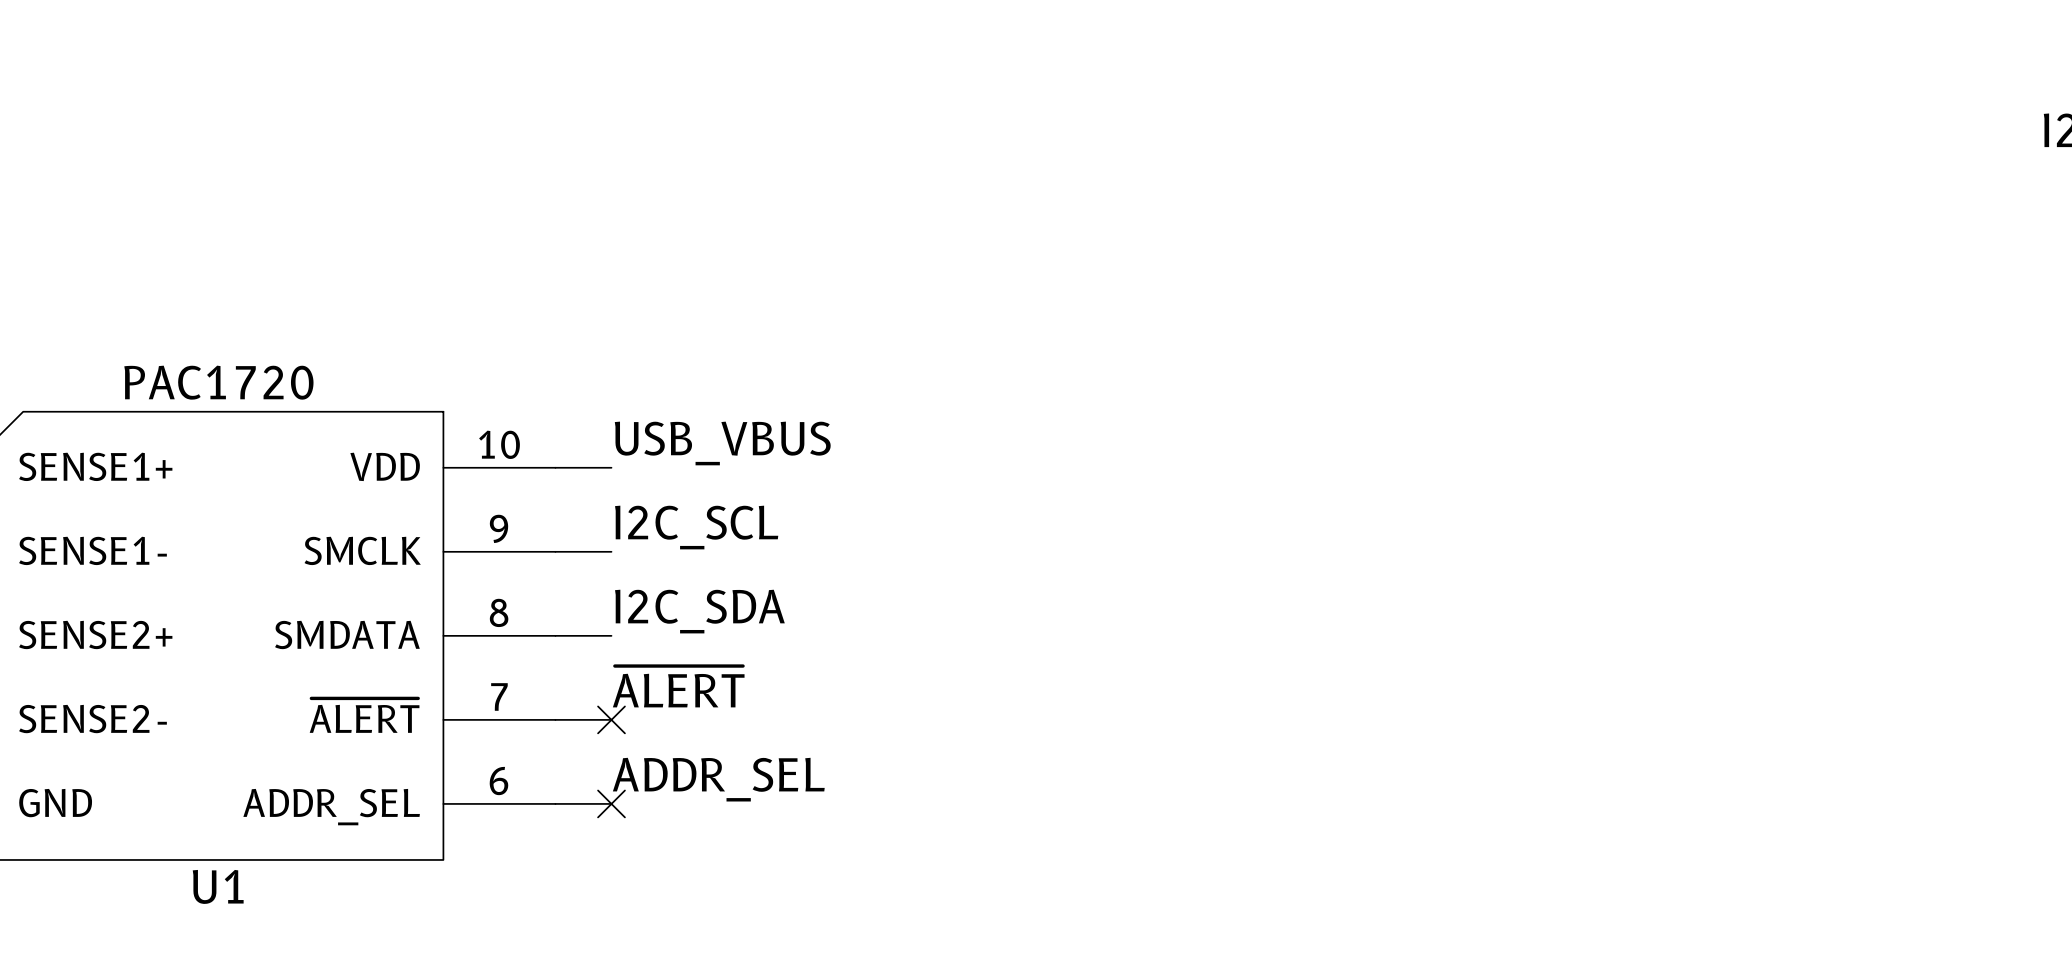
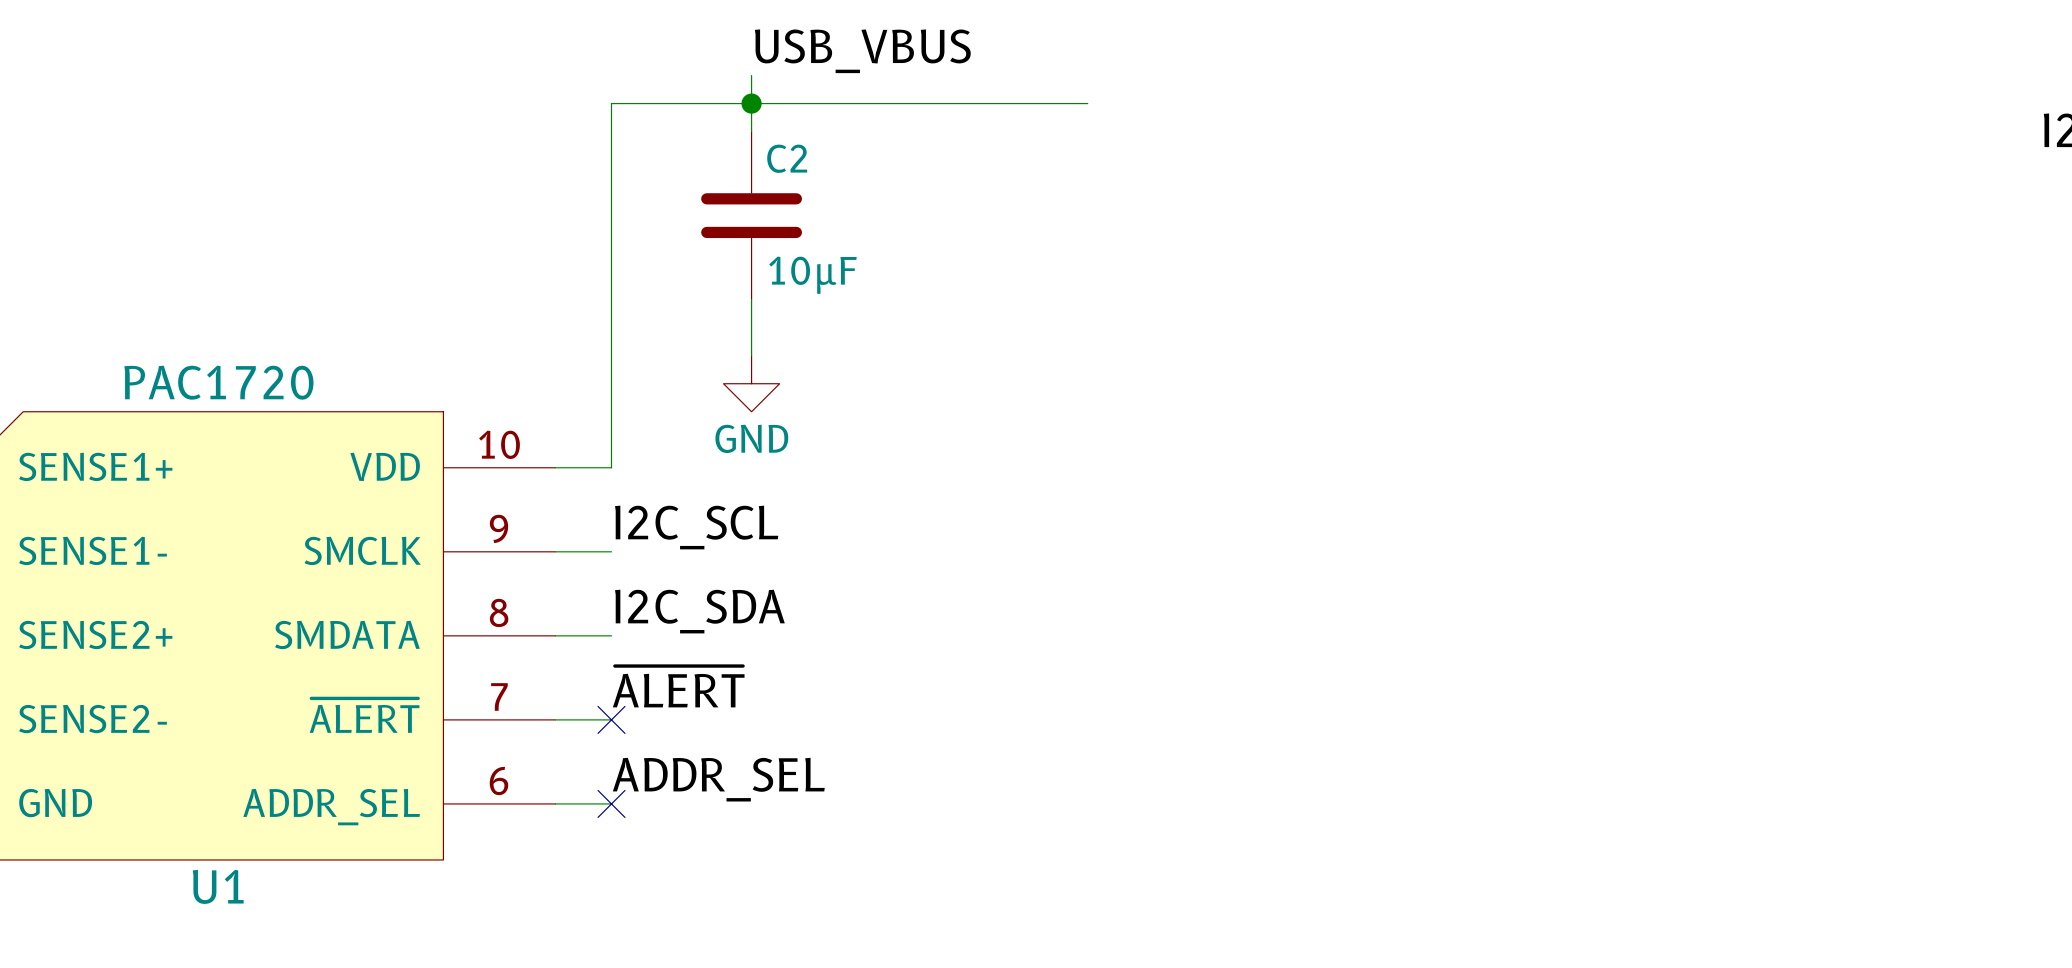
wire: none -> (751, 75) (751, 131)
junction: none -> (751, 103)
wire: none -> (1087, 103) (611, 103) (611, 467)
C2: none -> 10µF (751, 215)
wire: none -> (751, 299) (751, 355)
power symbol: none -> GND (751, 383)
label position: USB_VBUS (722, 443) -> USB_VBUS (862, 51)

